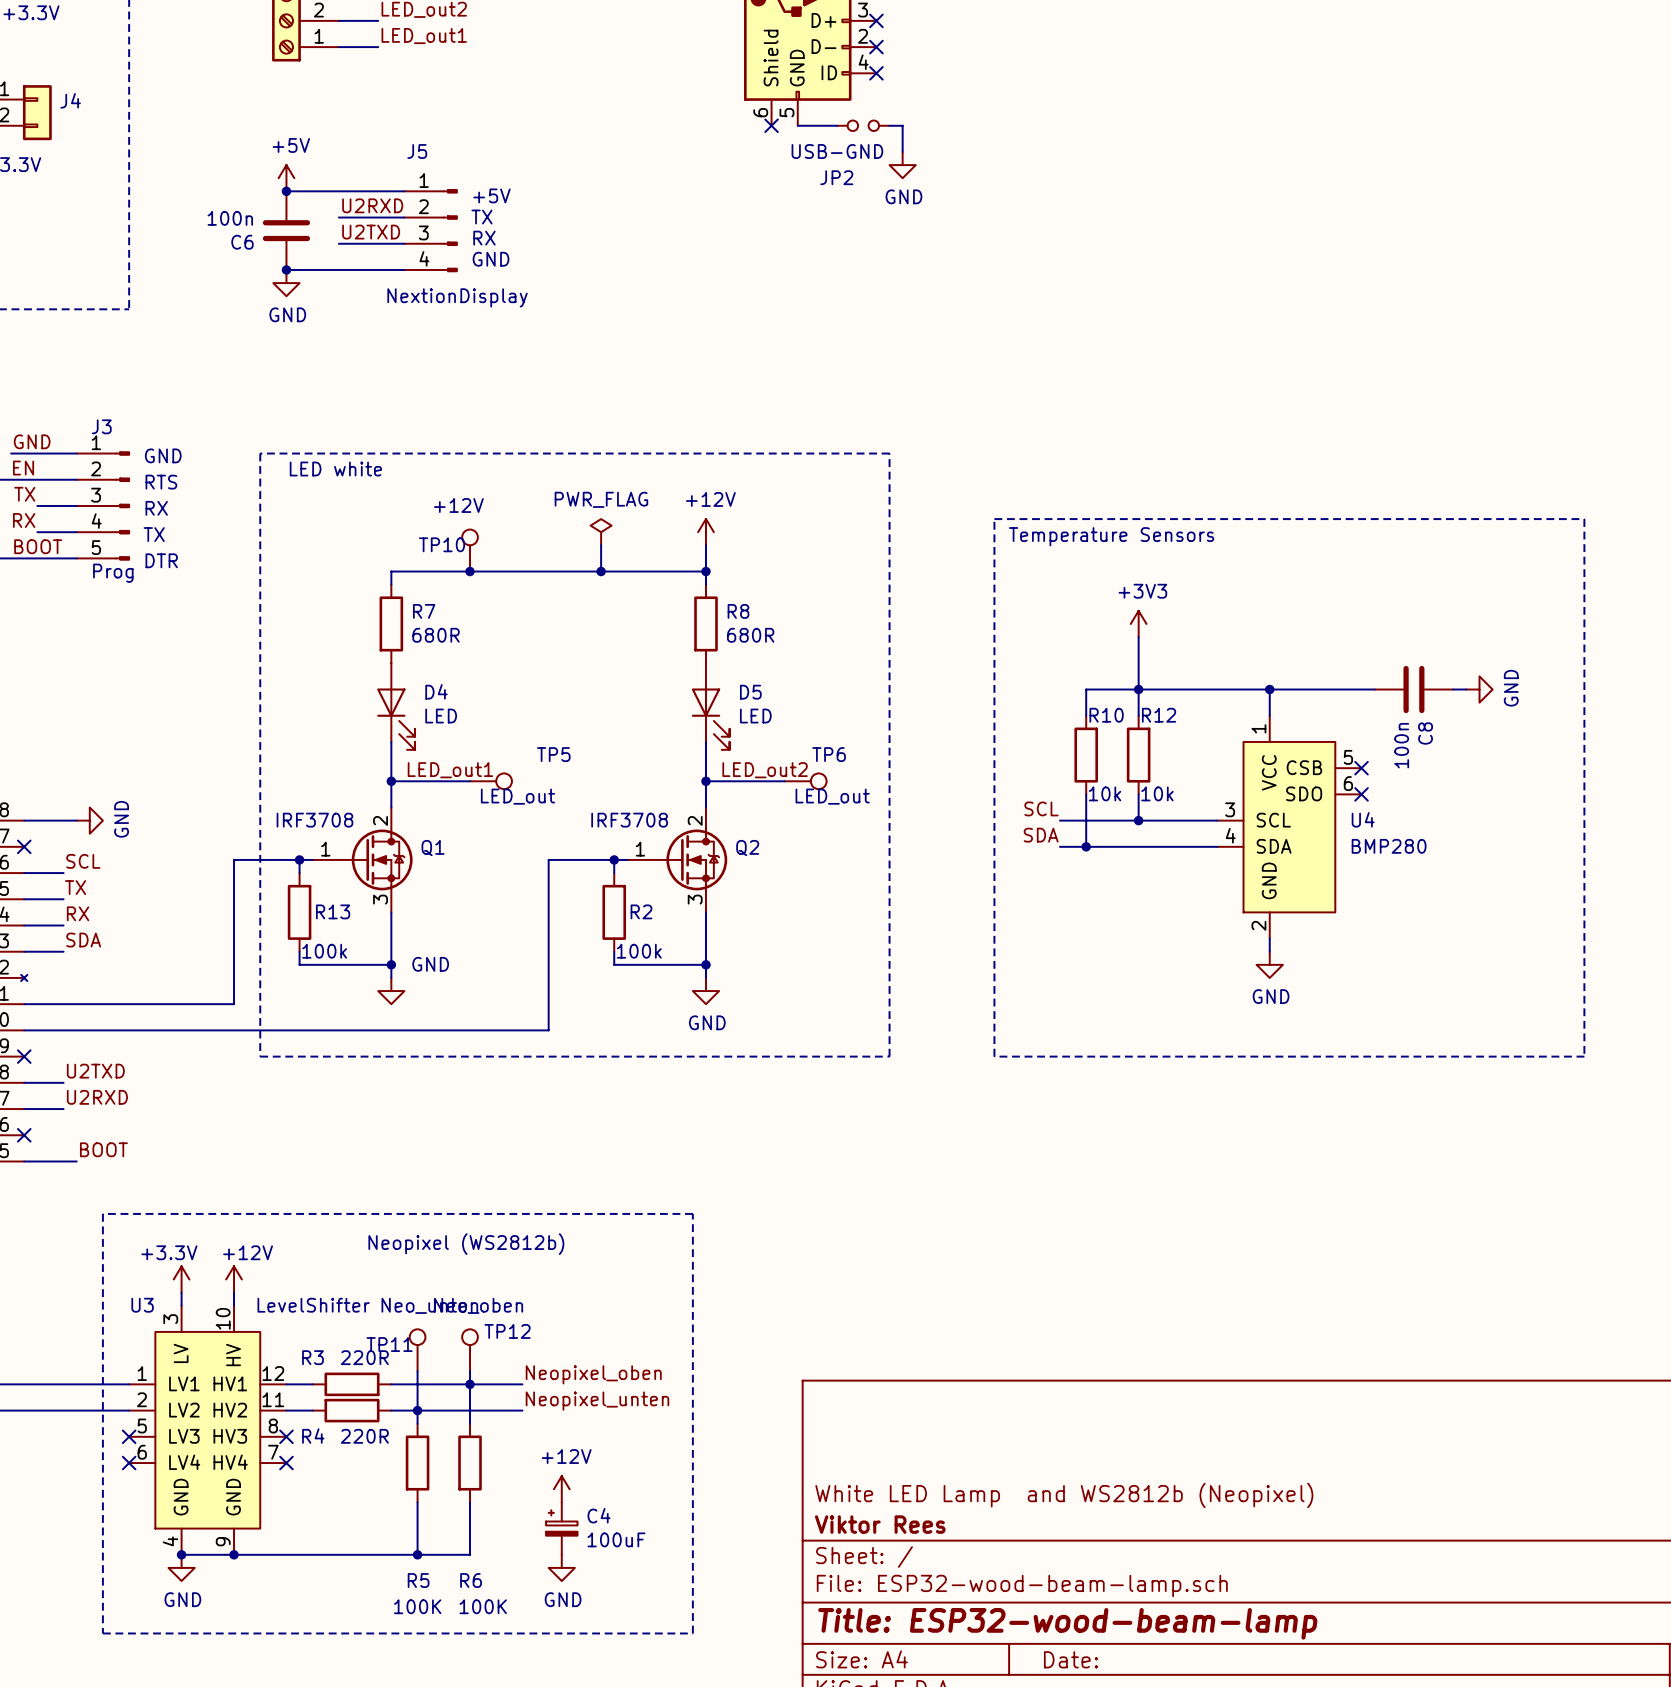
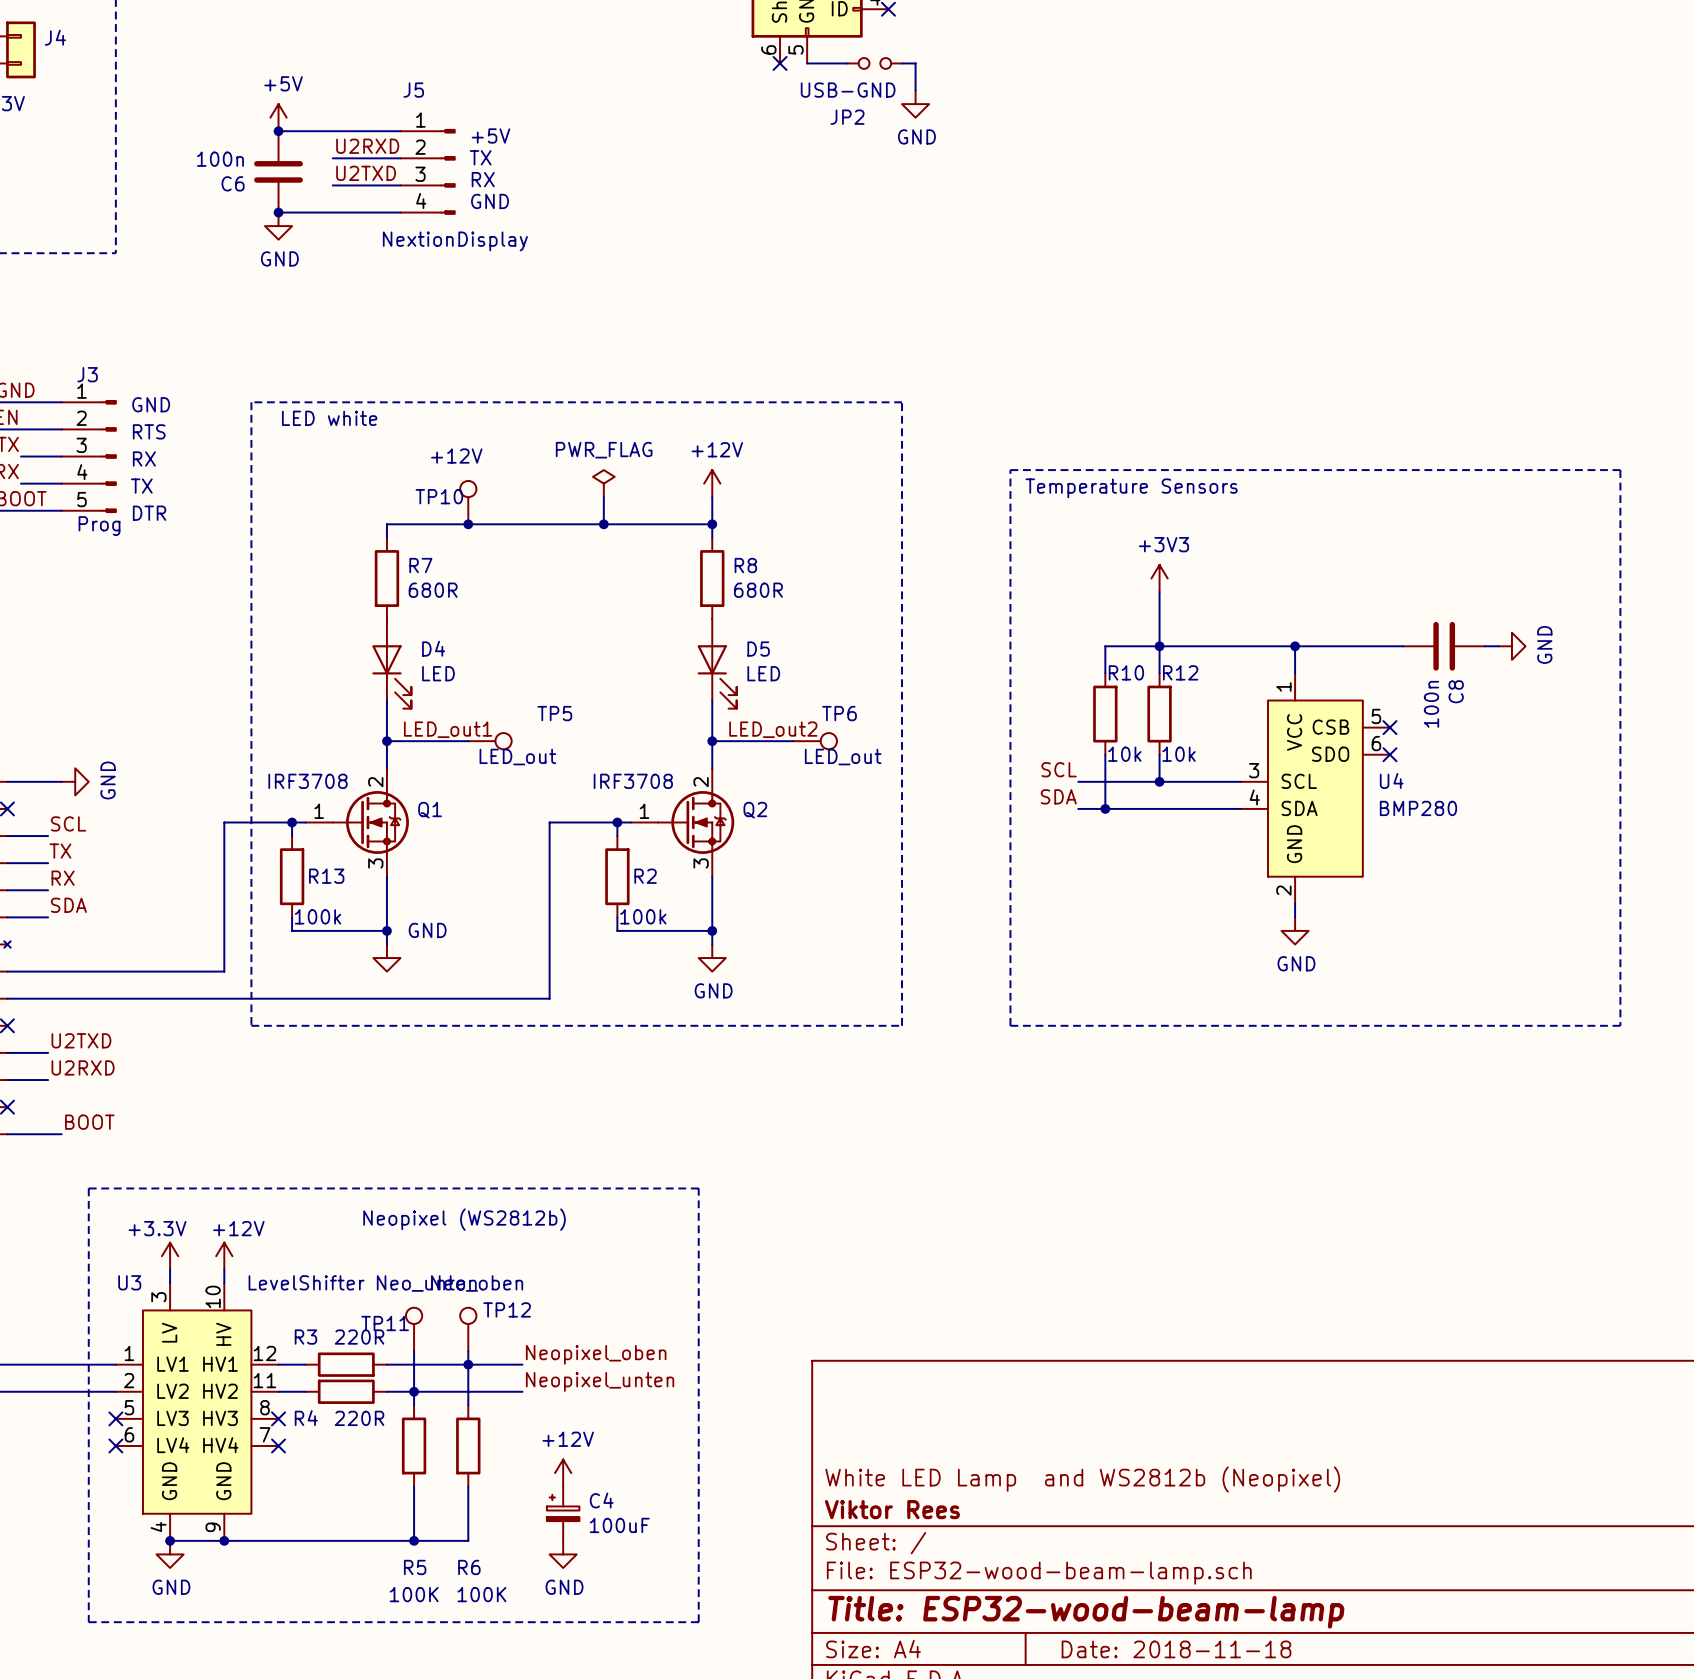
title block: Date: (1070, 1659) -> Date: 2018-11-18 (1176, 1649)

